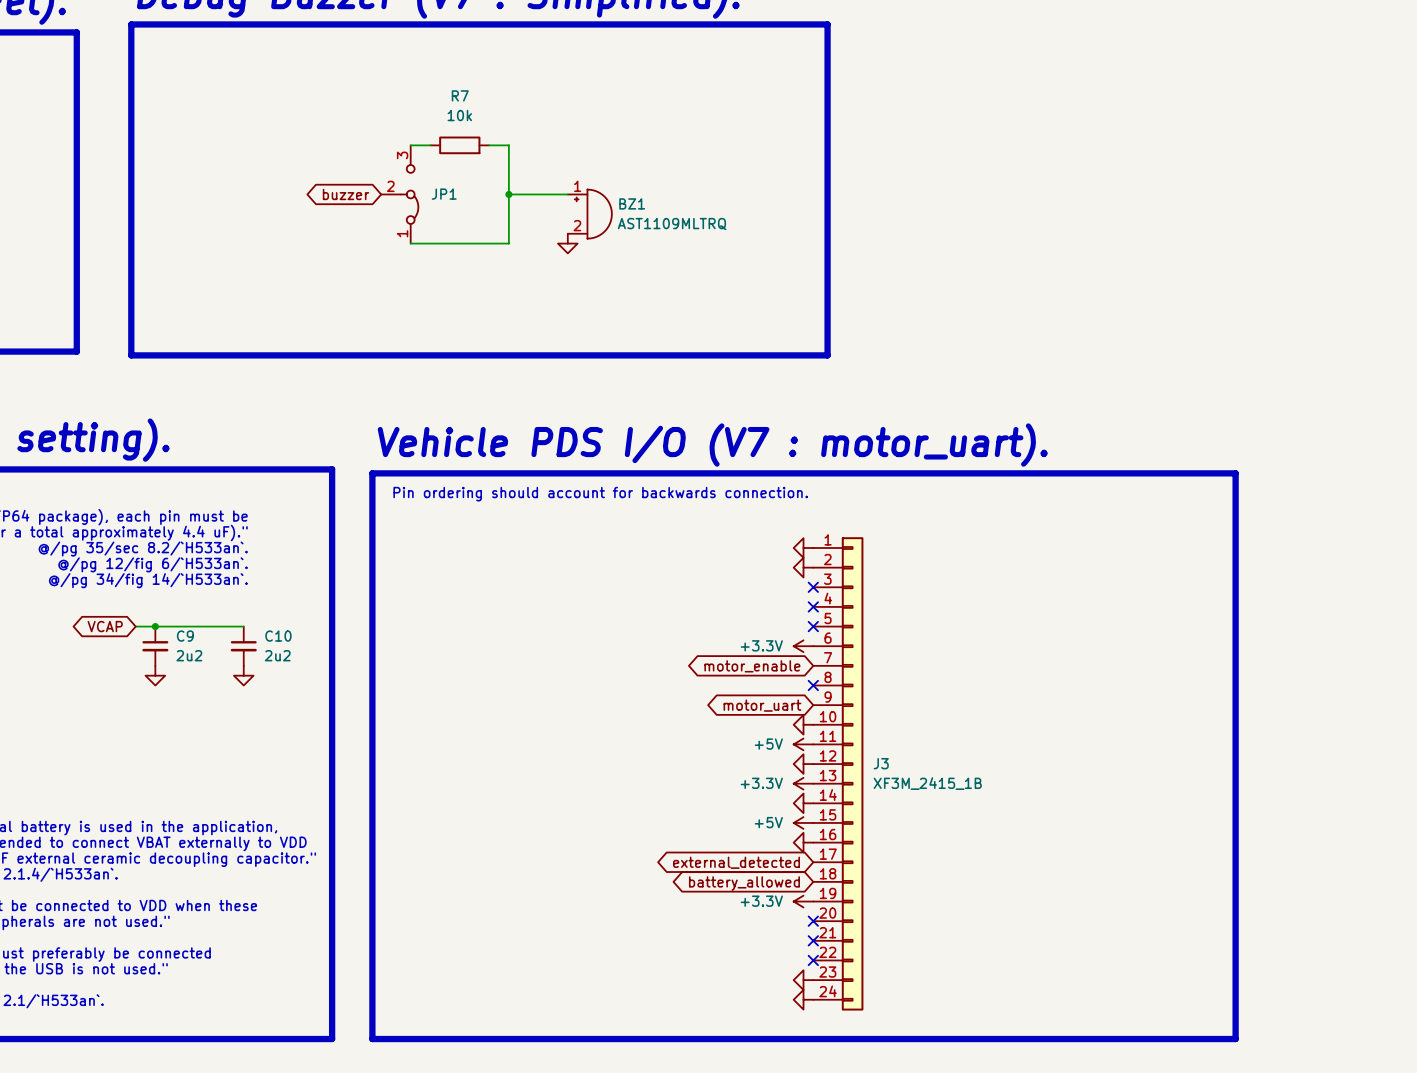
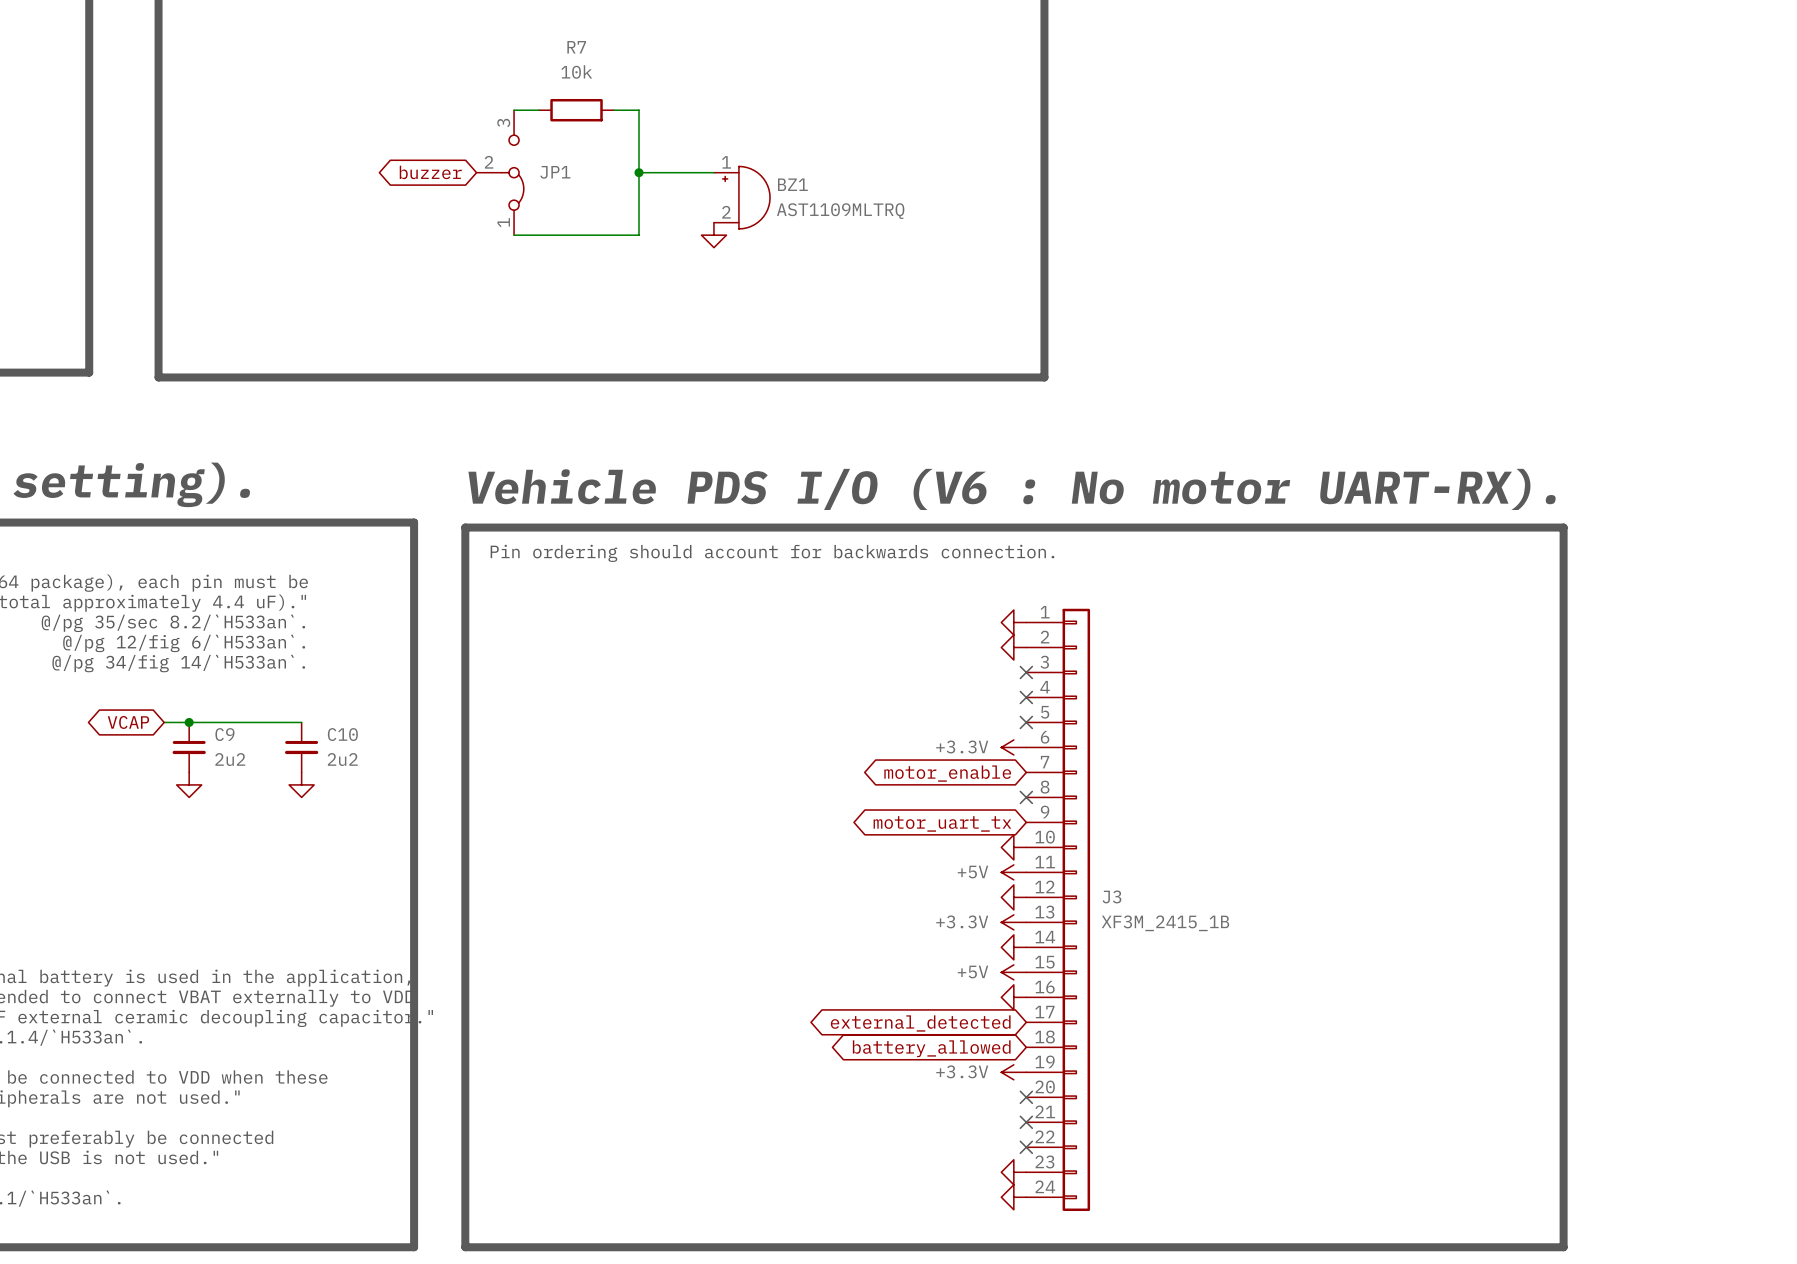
text: Vehicle PDS I/O (V7 : motor_uart). (712, 445) -> Vehicle PDS I/O (V6 : No motor UART-RX). (1012, 489)
global label: motor_uart (762, 705) -> motor_uart_tx (942, 823)

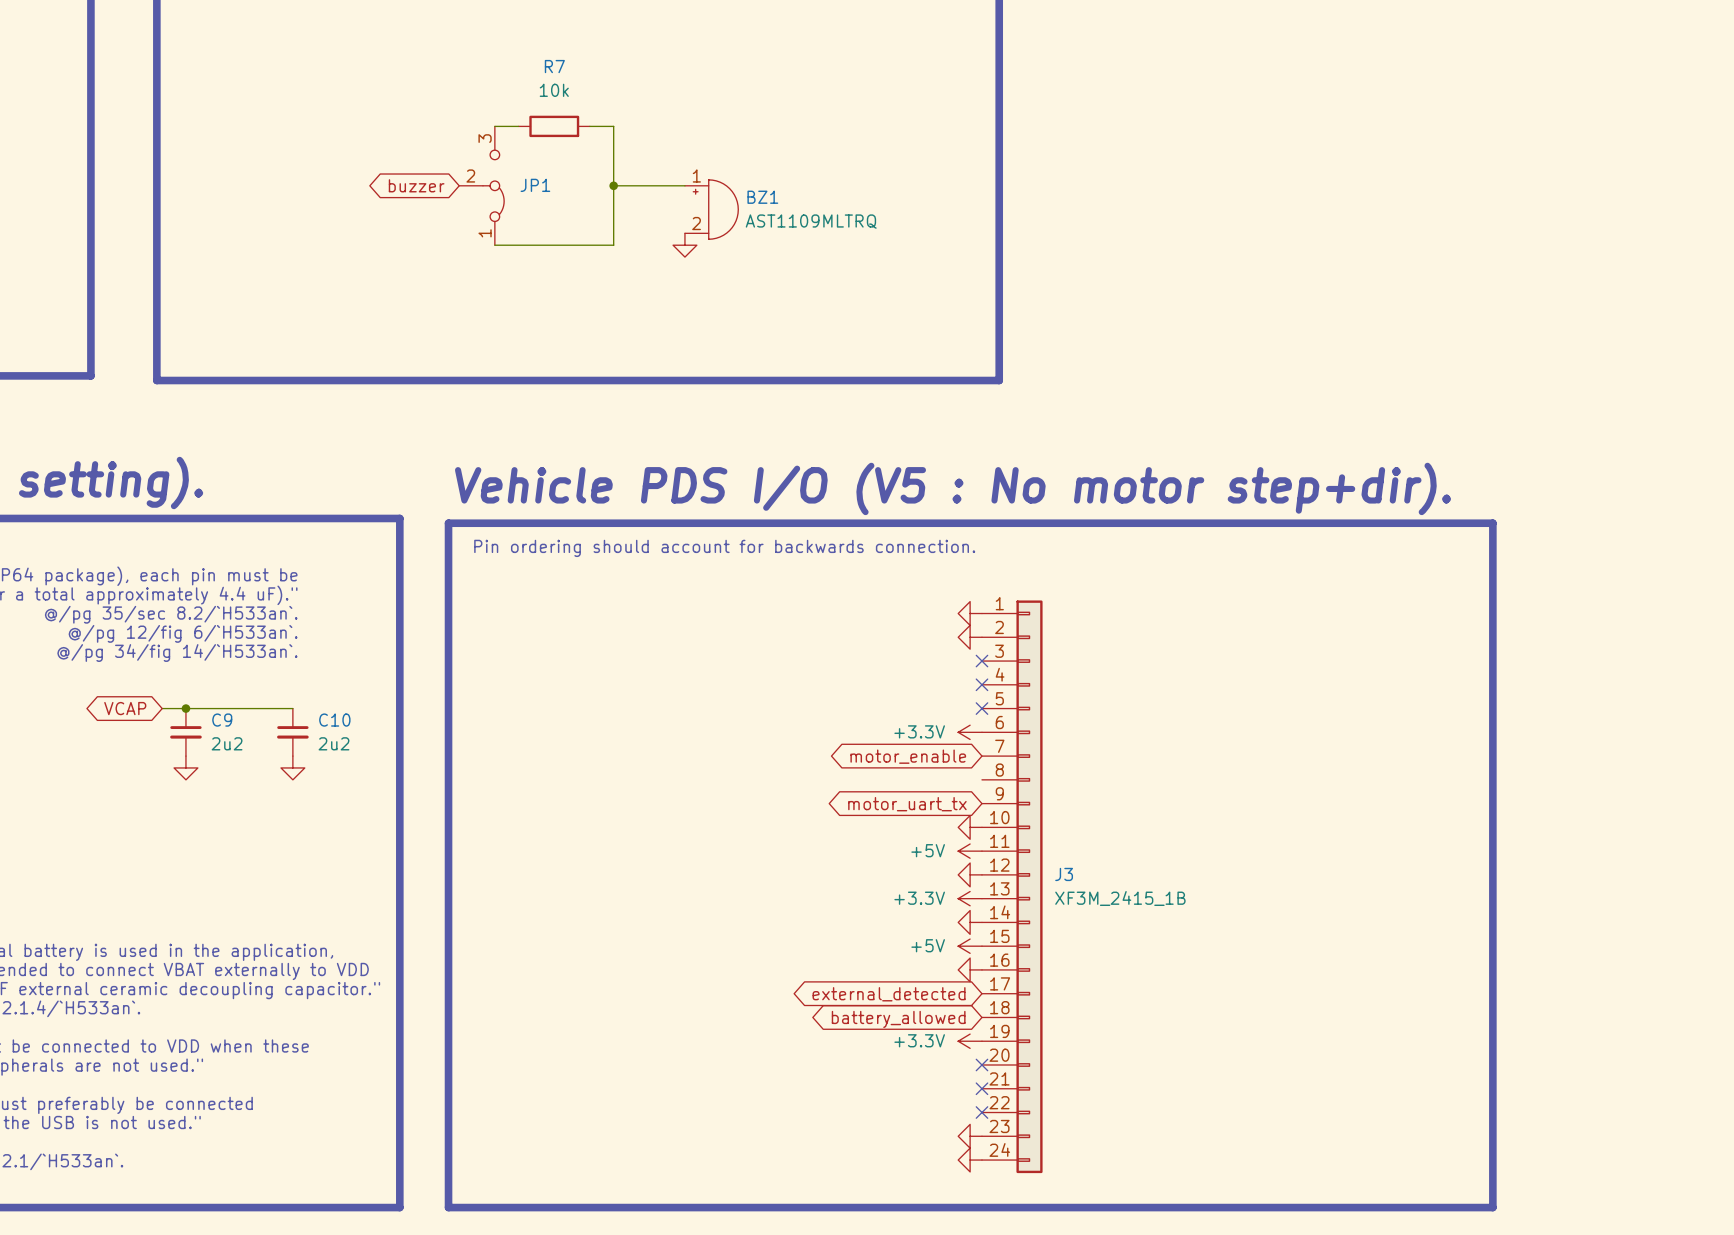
text: Vehicle PDS I/O (V6 : No motor UART-RX). (1012, 489) -> Vehicle PDS I/O (V5 : No motor step+dir). (953, 488)
no-connect mark: (1026, 797) -> none

